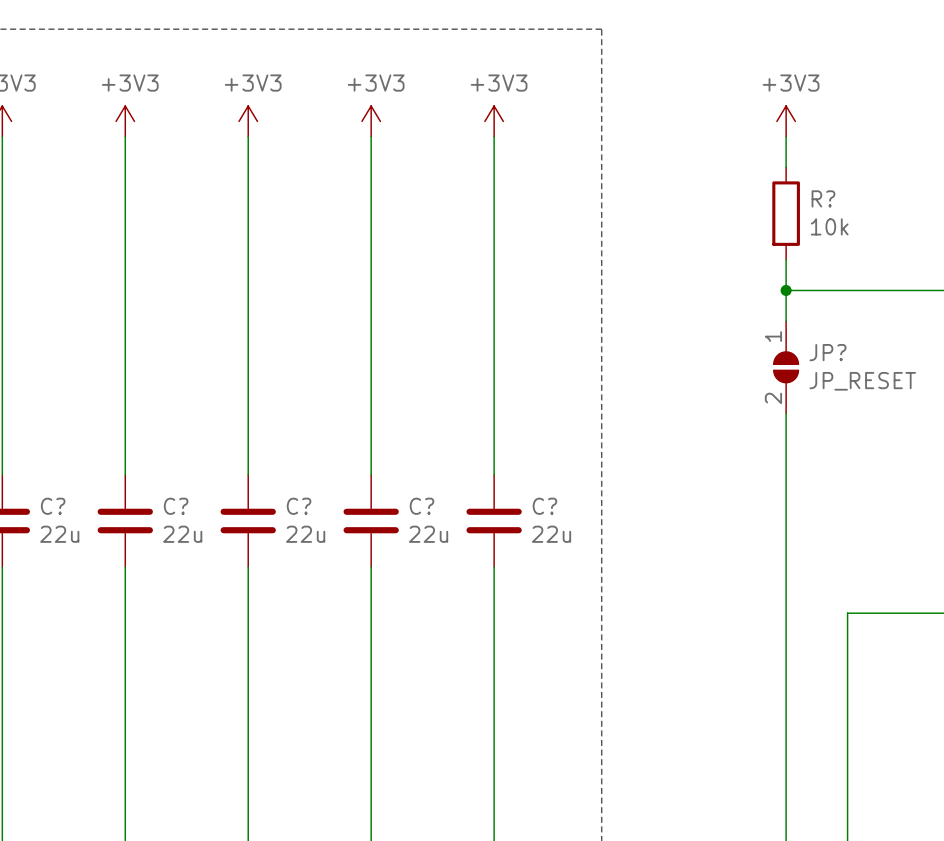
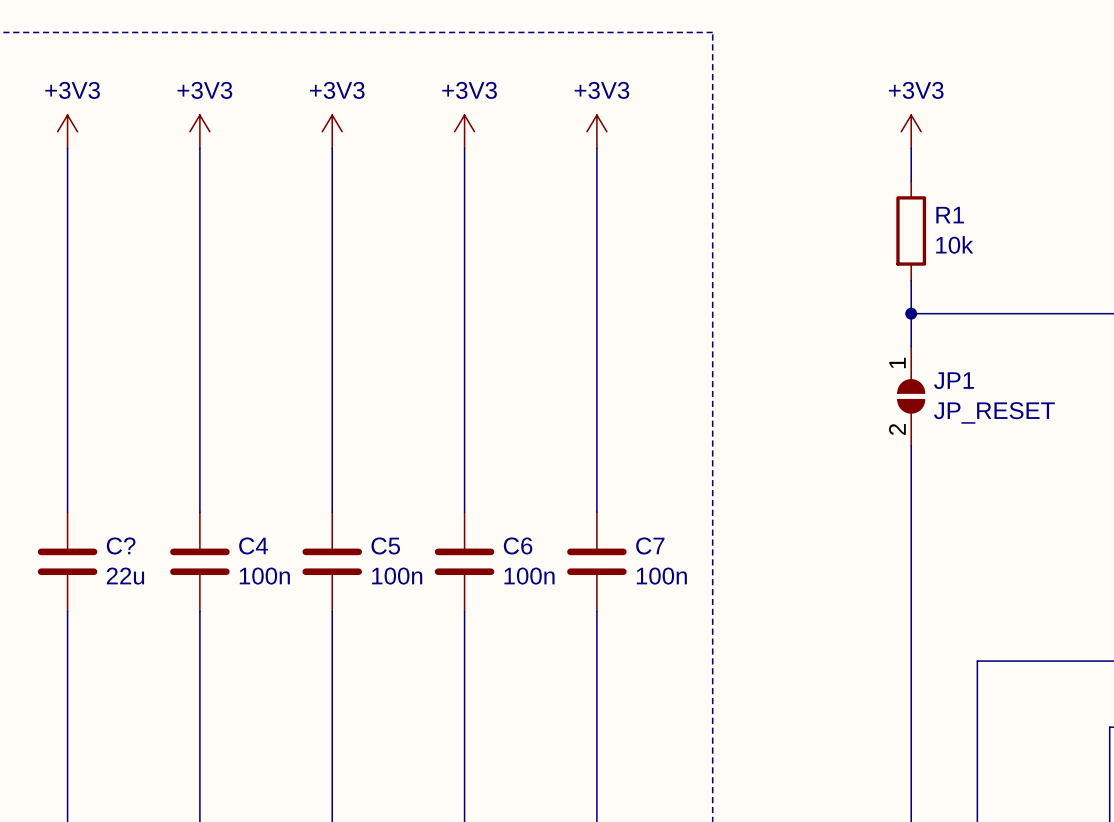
R? name: R? (823, 198) -> R1 (950, 215)
JP? name: JP? (827, 352) -> JP1 (954, 380)
C? name: C? (176, 506) -> C4 (253, 545)
C? name: C? (299, 506) -> C5 (385, 545)
C? name: C? (422, 506) -> C6 (518, 545)
C? name: C? (544, 506) -> C7 (650, 545)
C? value: 22u (182, 534) -> 100n (264, 576)
C? value: 22u (305, 534) -> 100n (397, 576)
C? value: 22u (428, 534) -> 100n (529, 576)
C? value: 22u (551, 534) -> 100n (661, 576)

